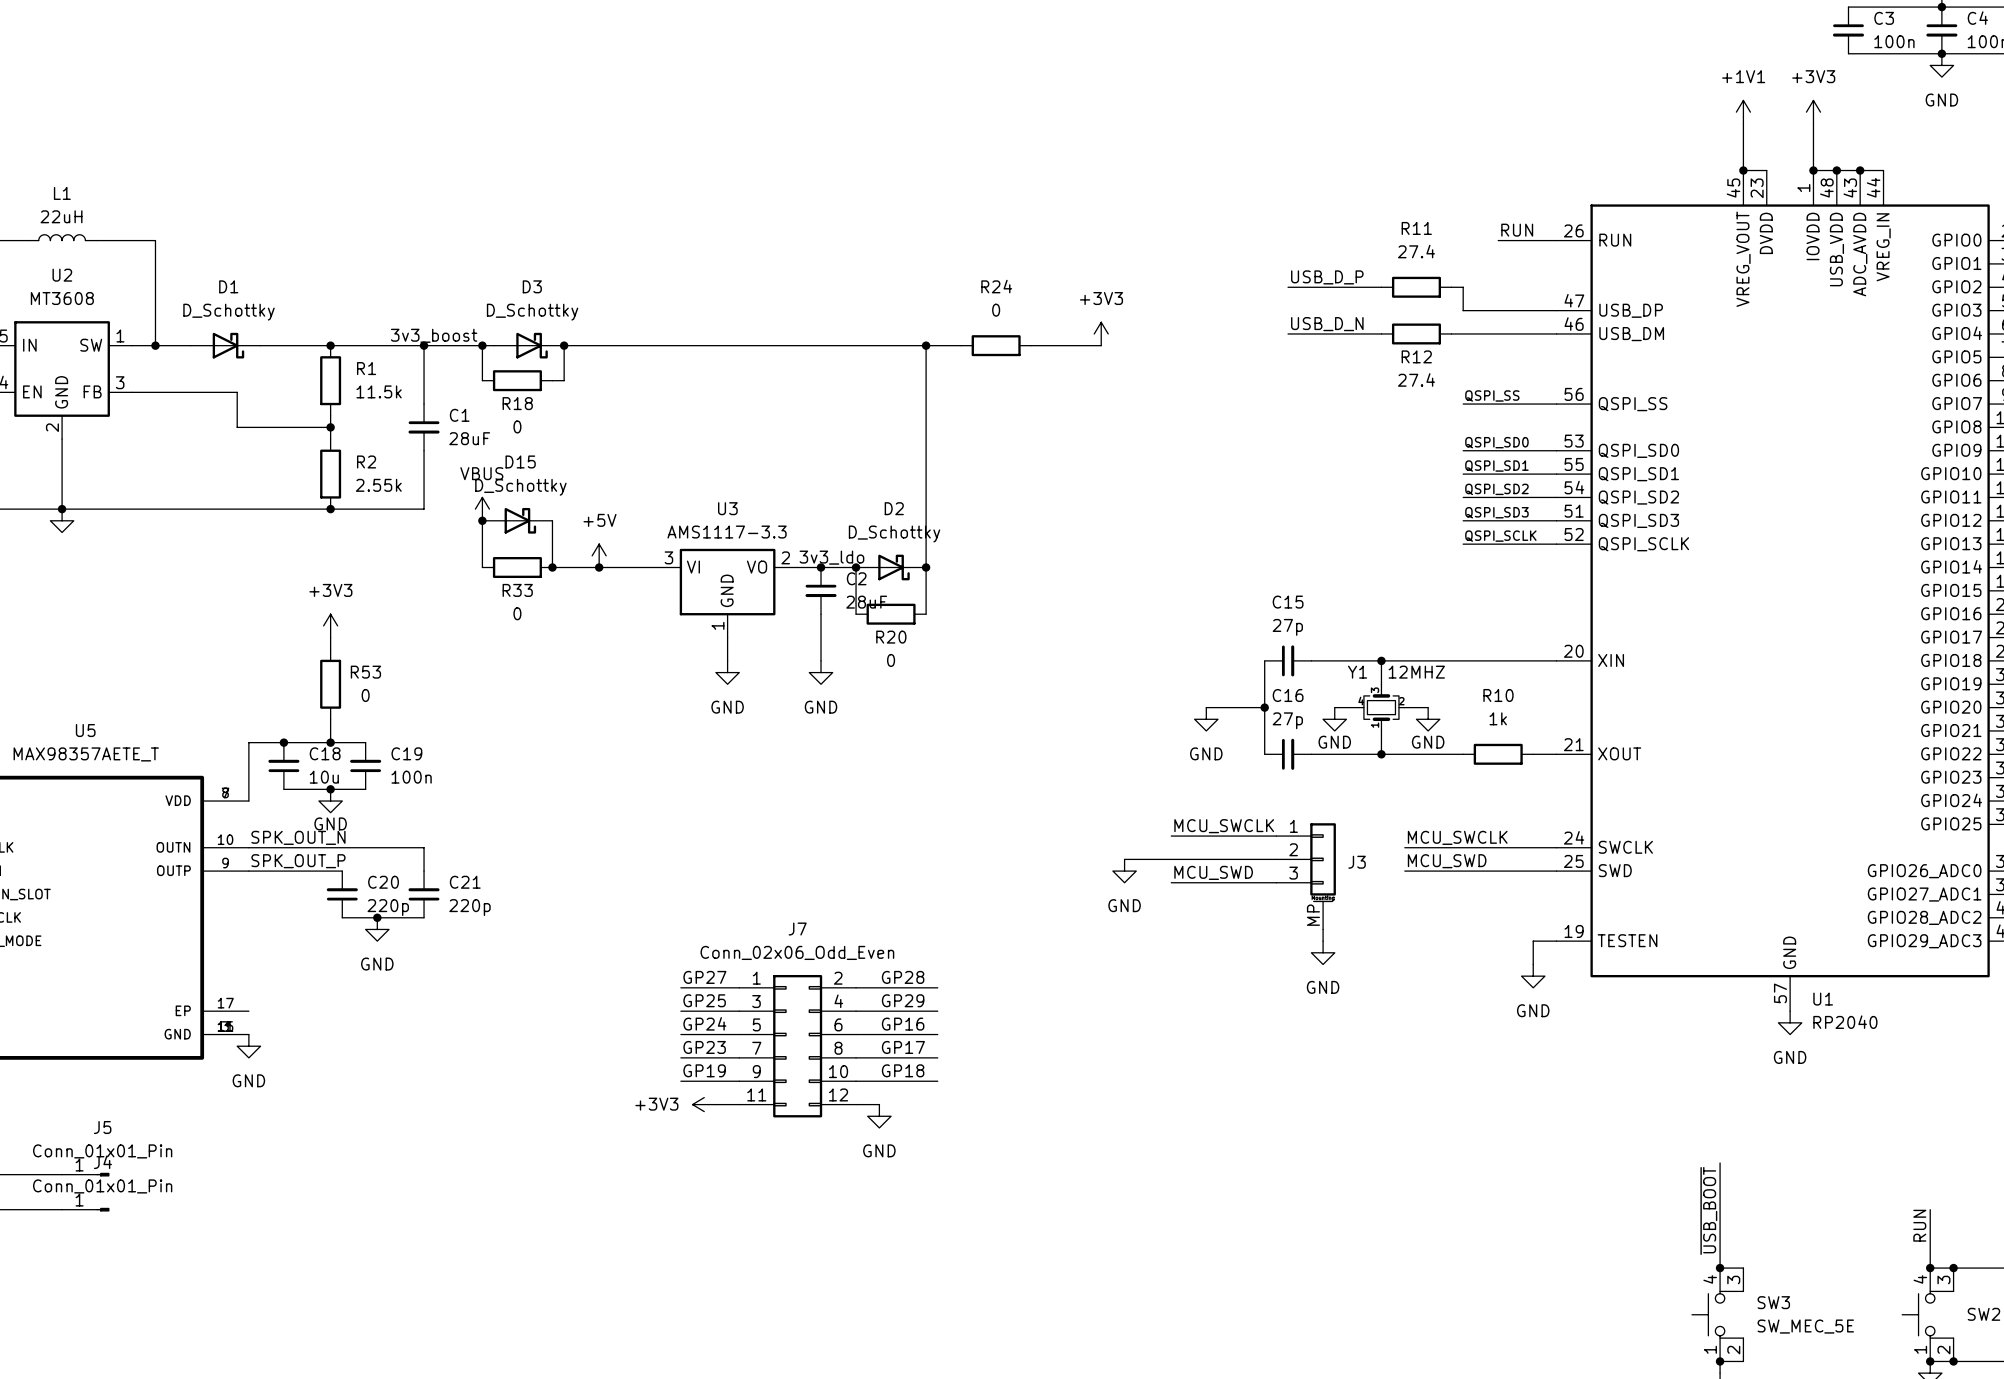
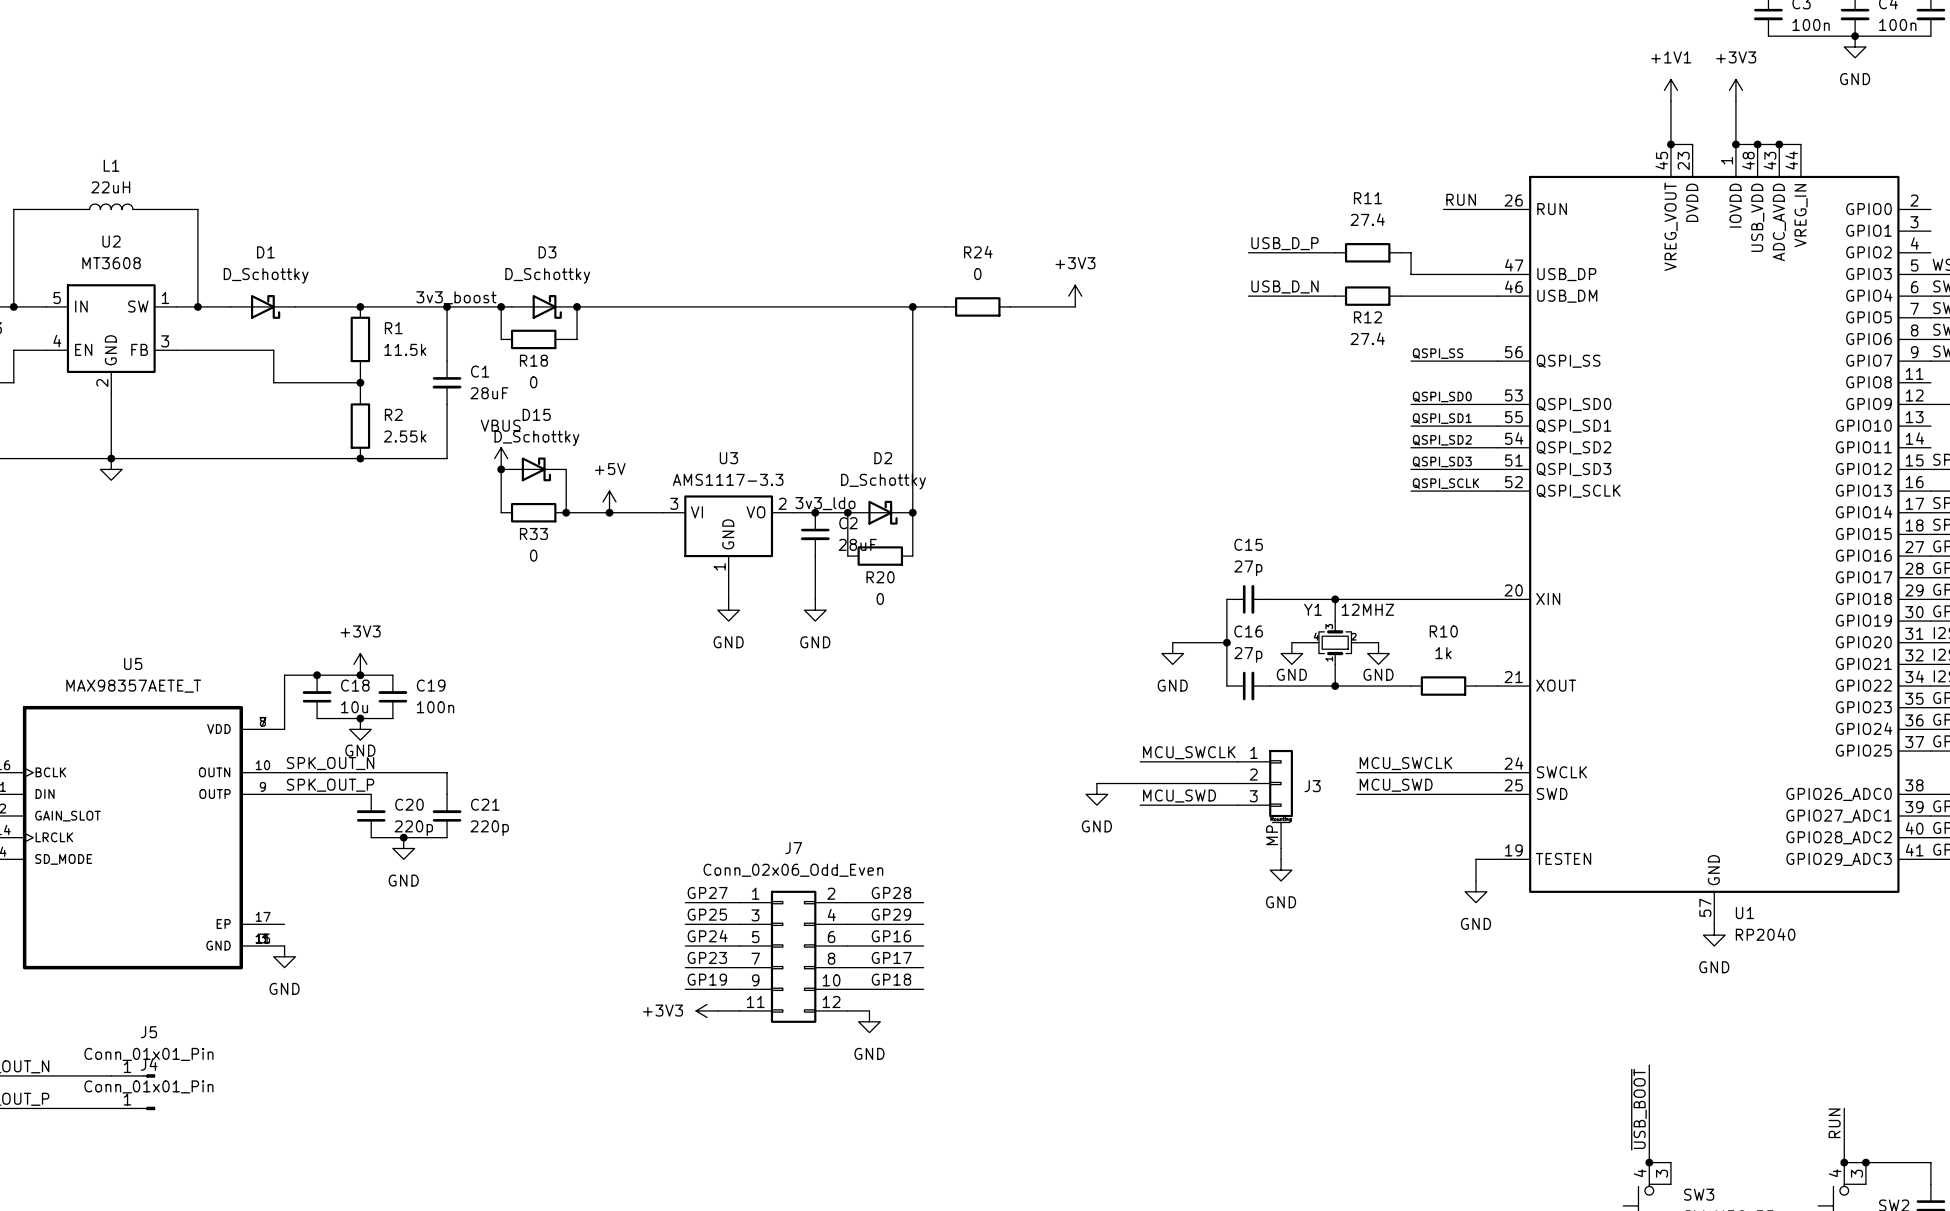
power symbol position: +3V3 (330, 625) -> +3V3 (360, 664)
wire: (330, 637) (330, 649) -> none
R53: 0 (330, 684) -> none

